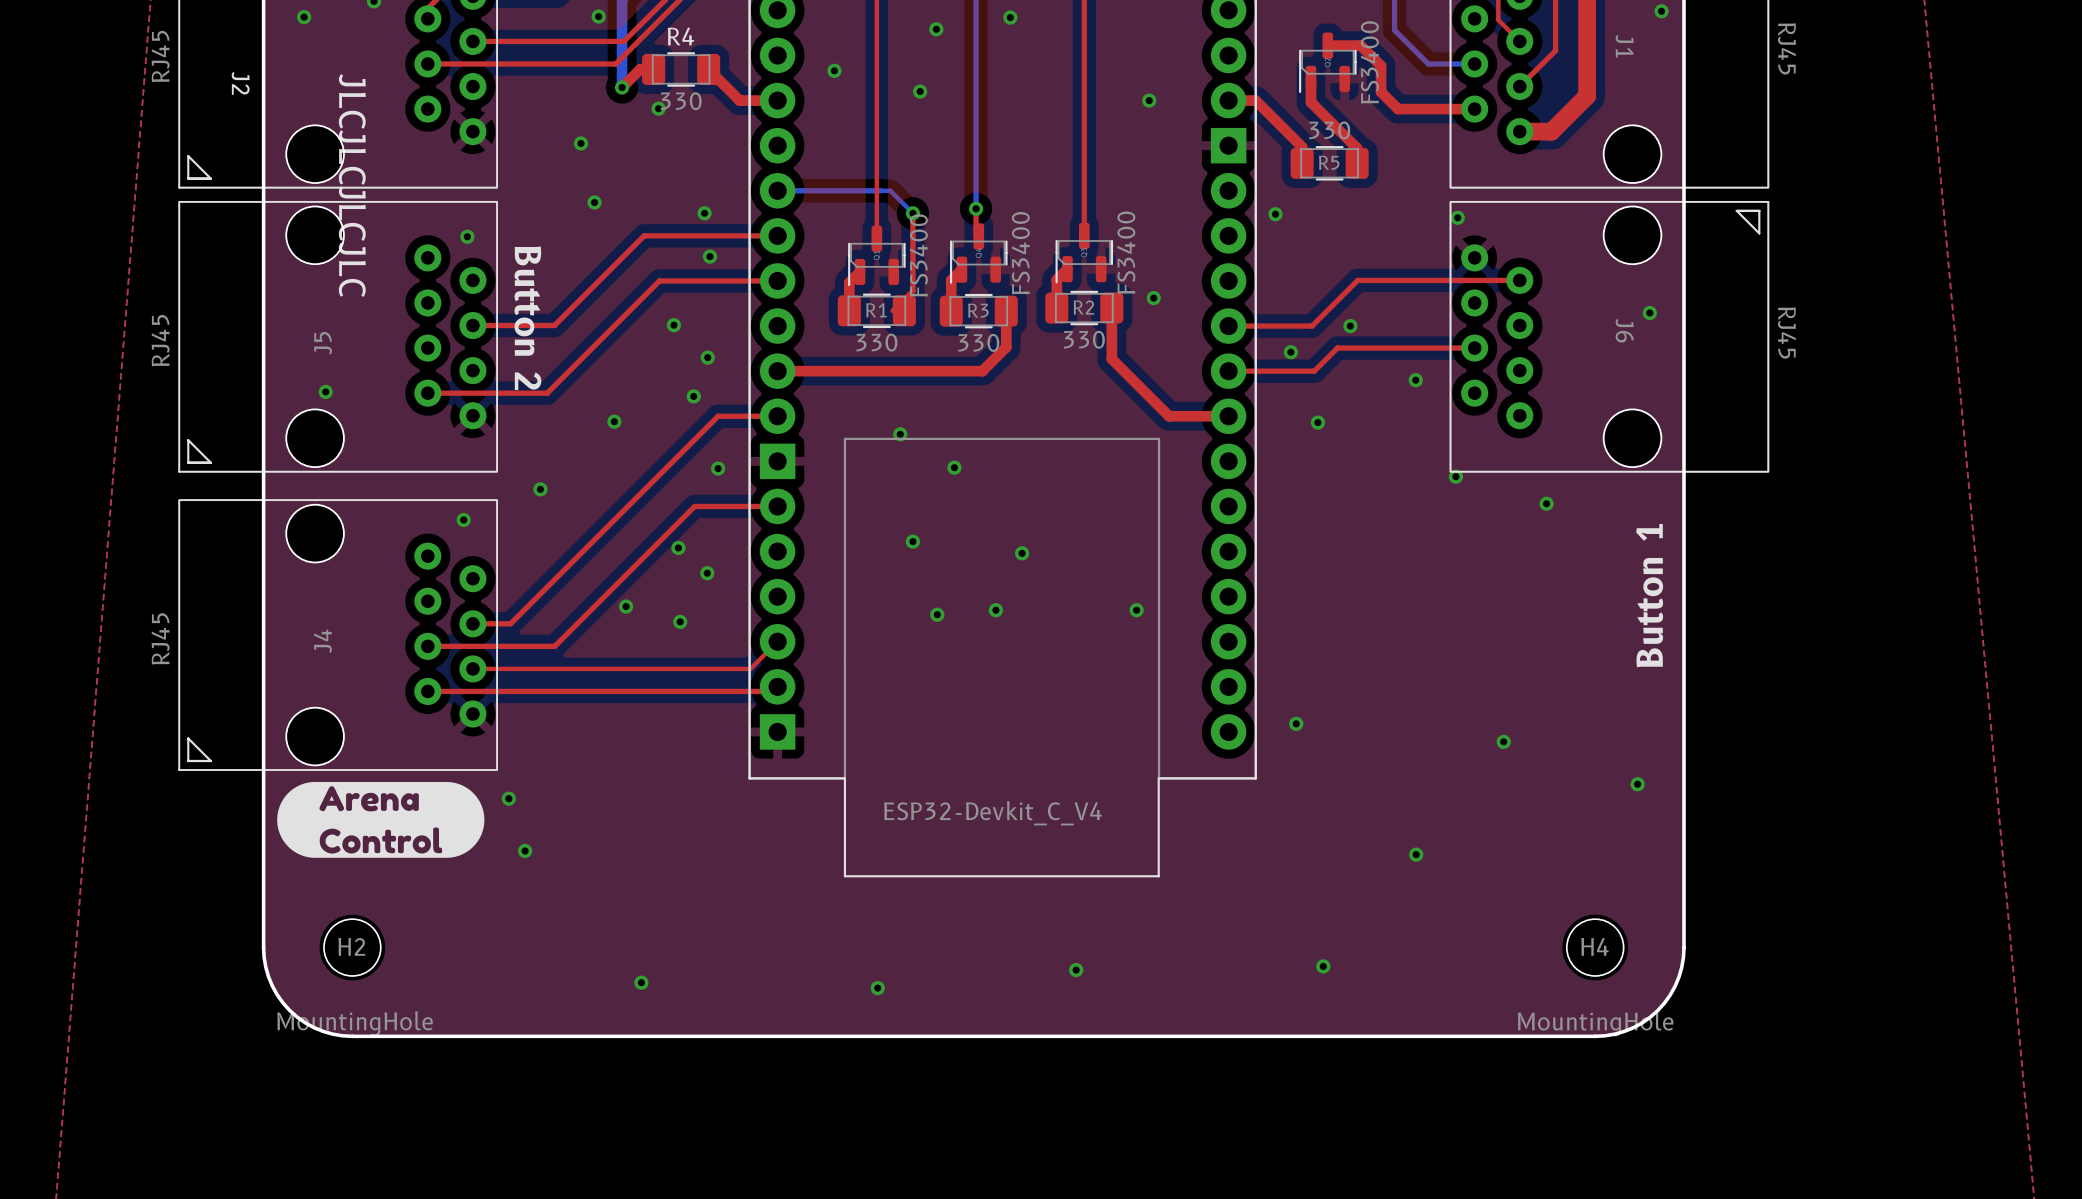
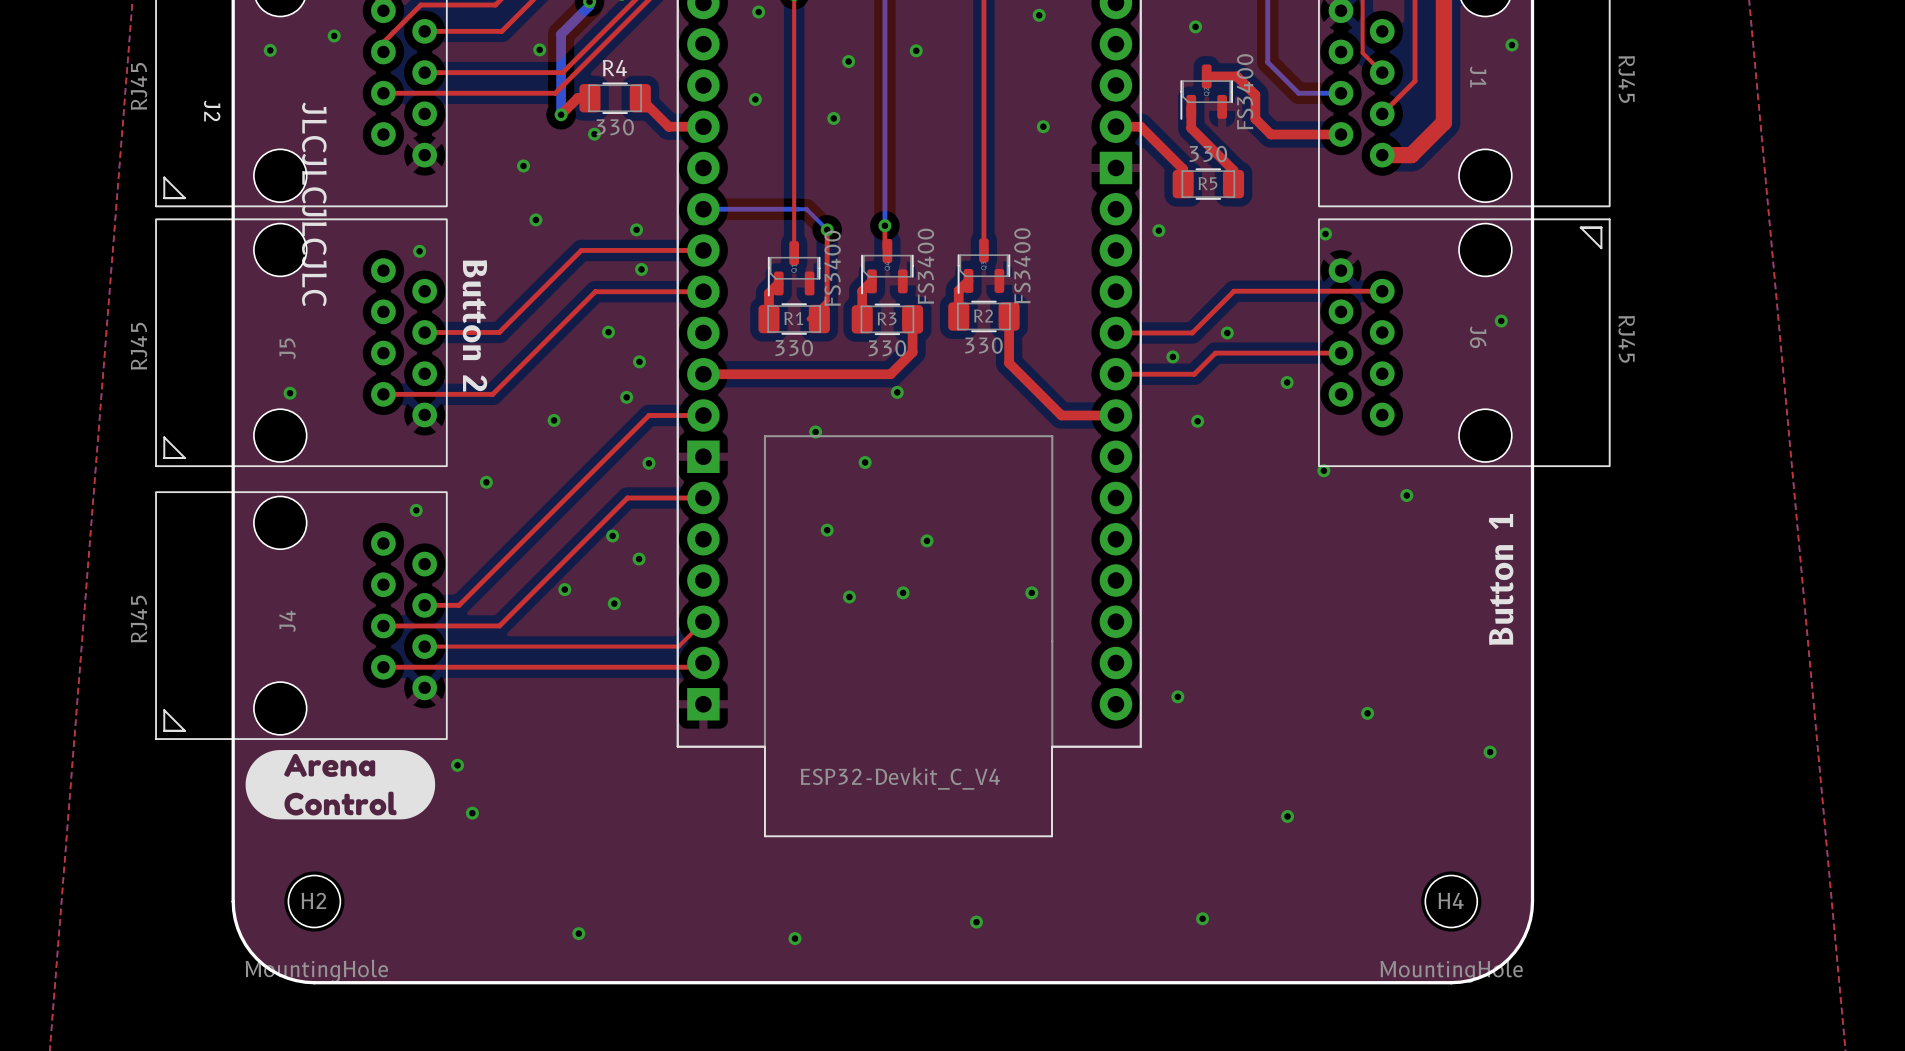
via: (1153, 298) -> none
via: none -> (897, 392)

